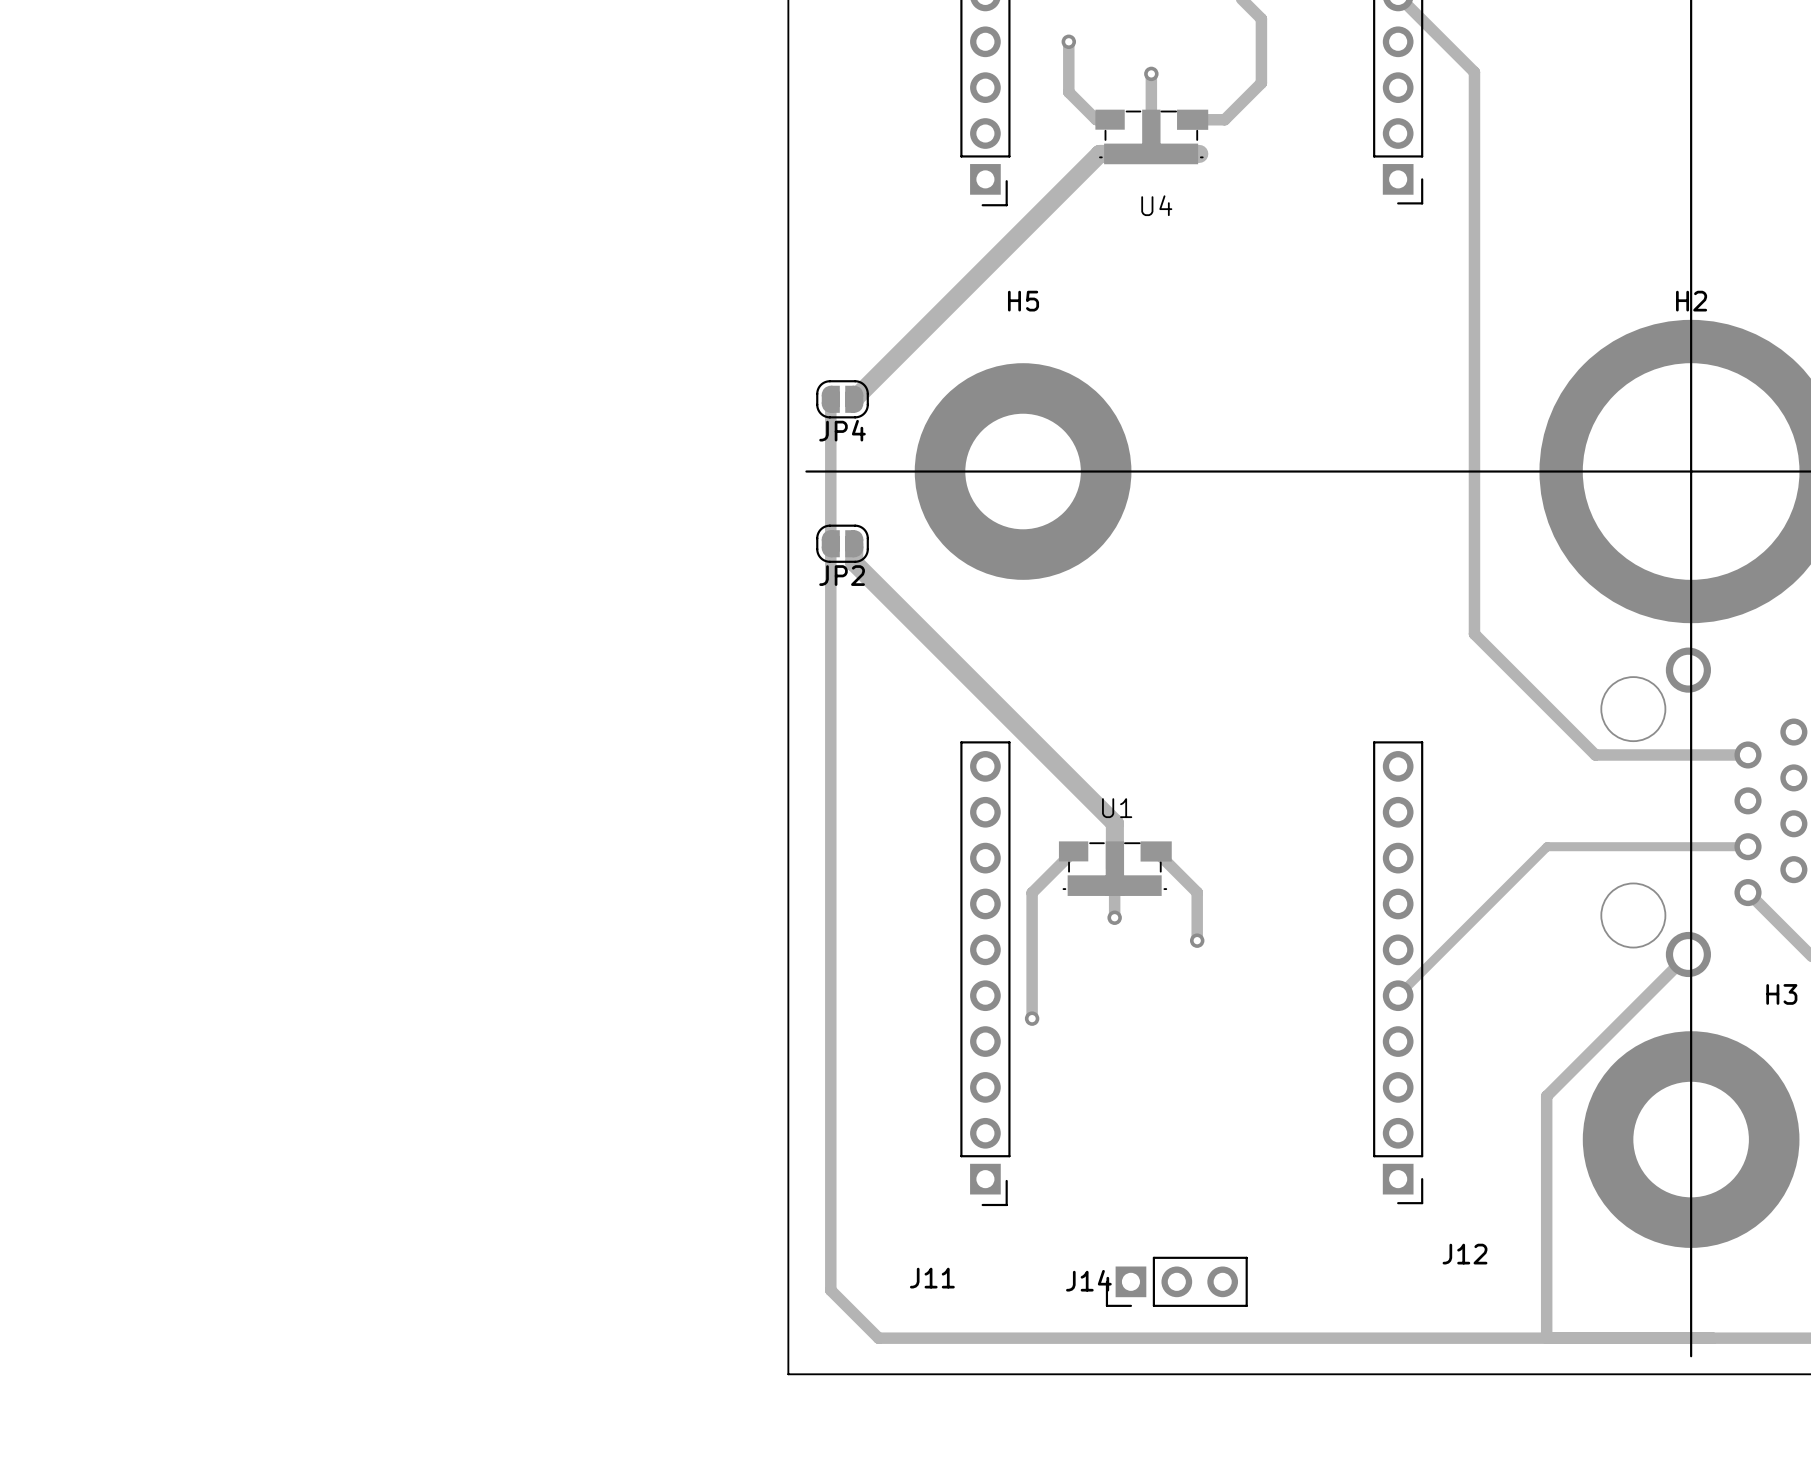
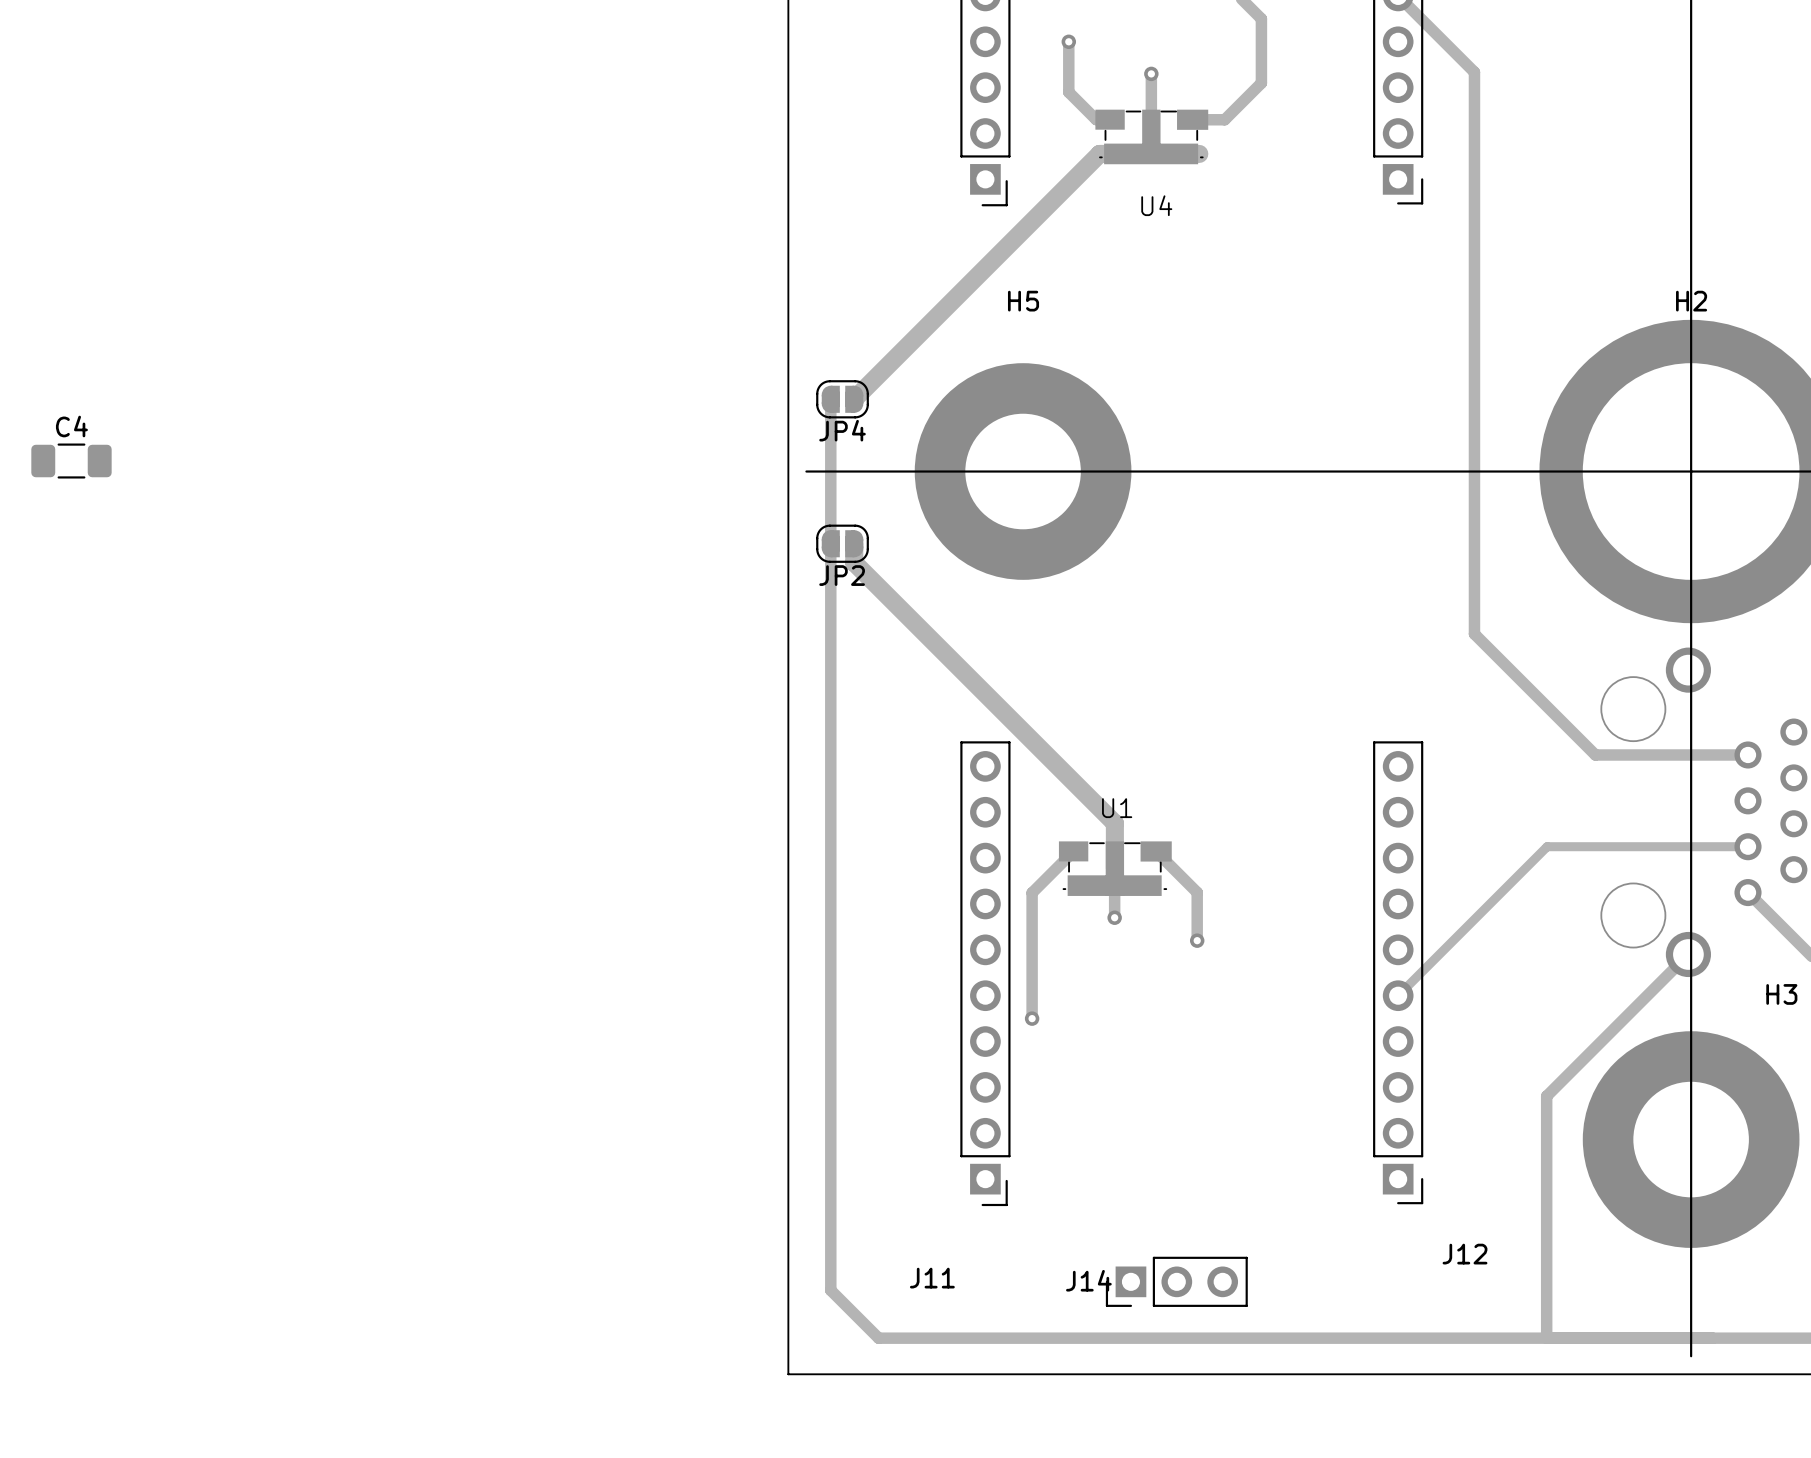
C4: none -> (71, 461)

